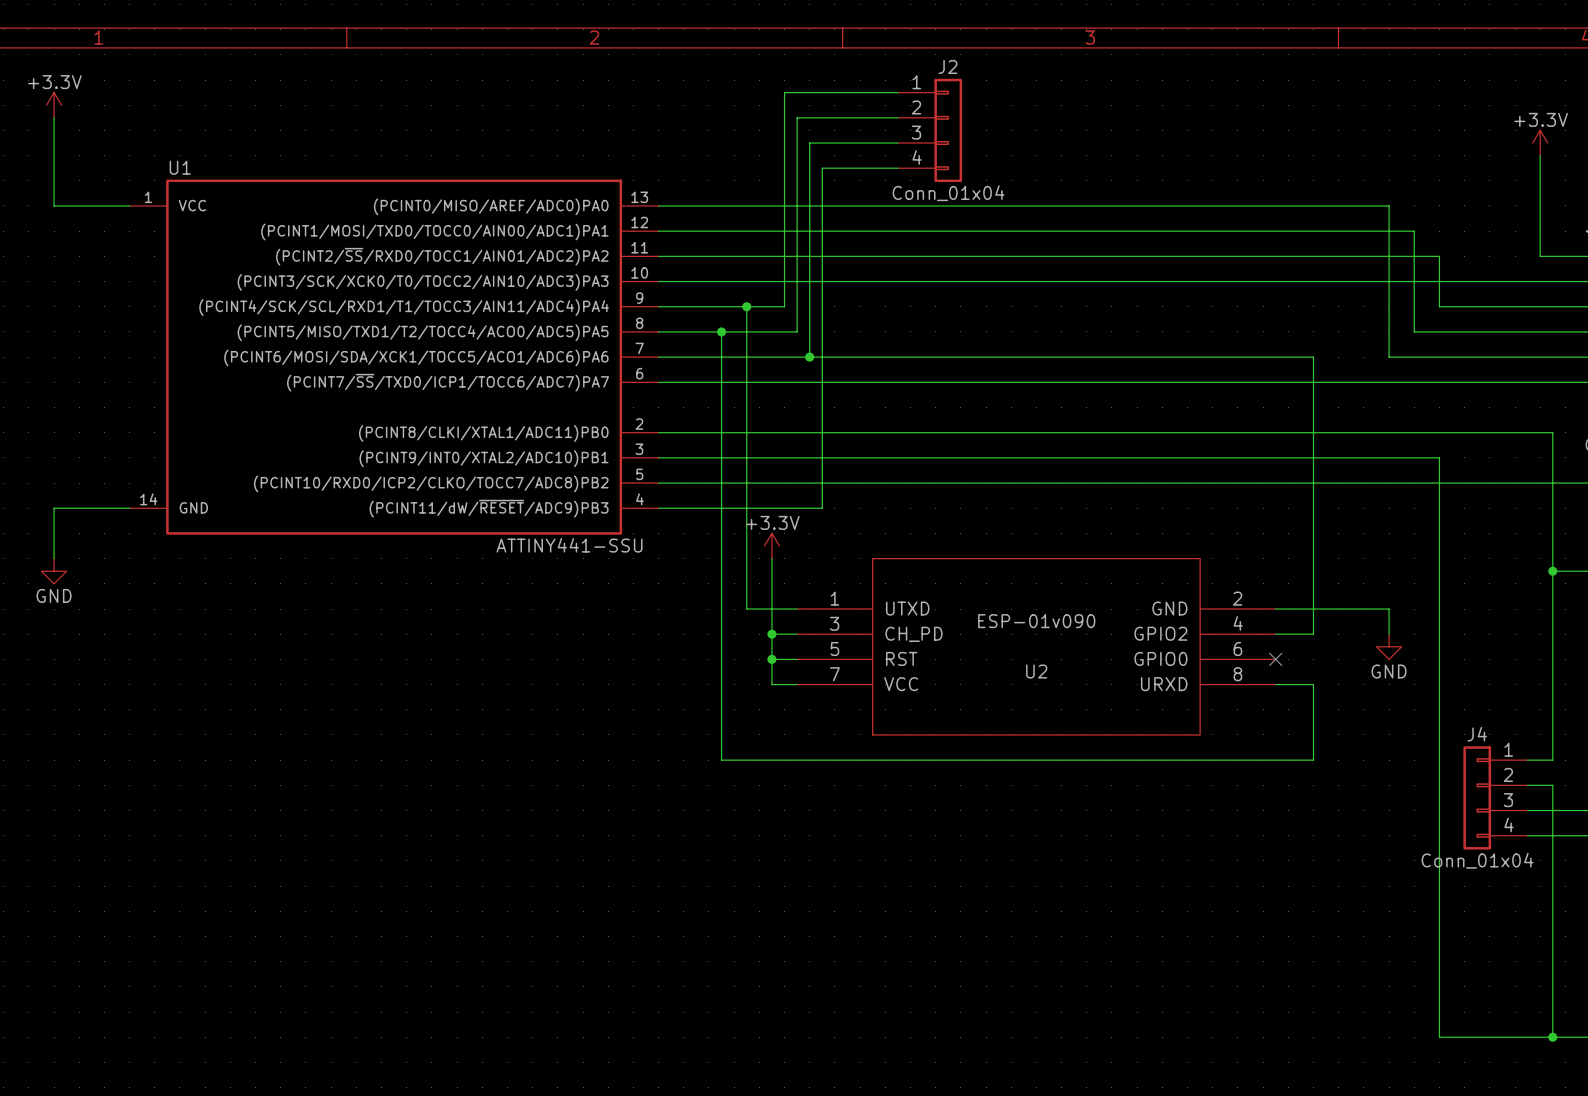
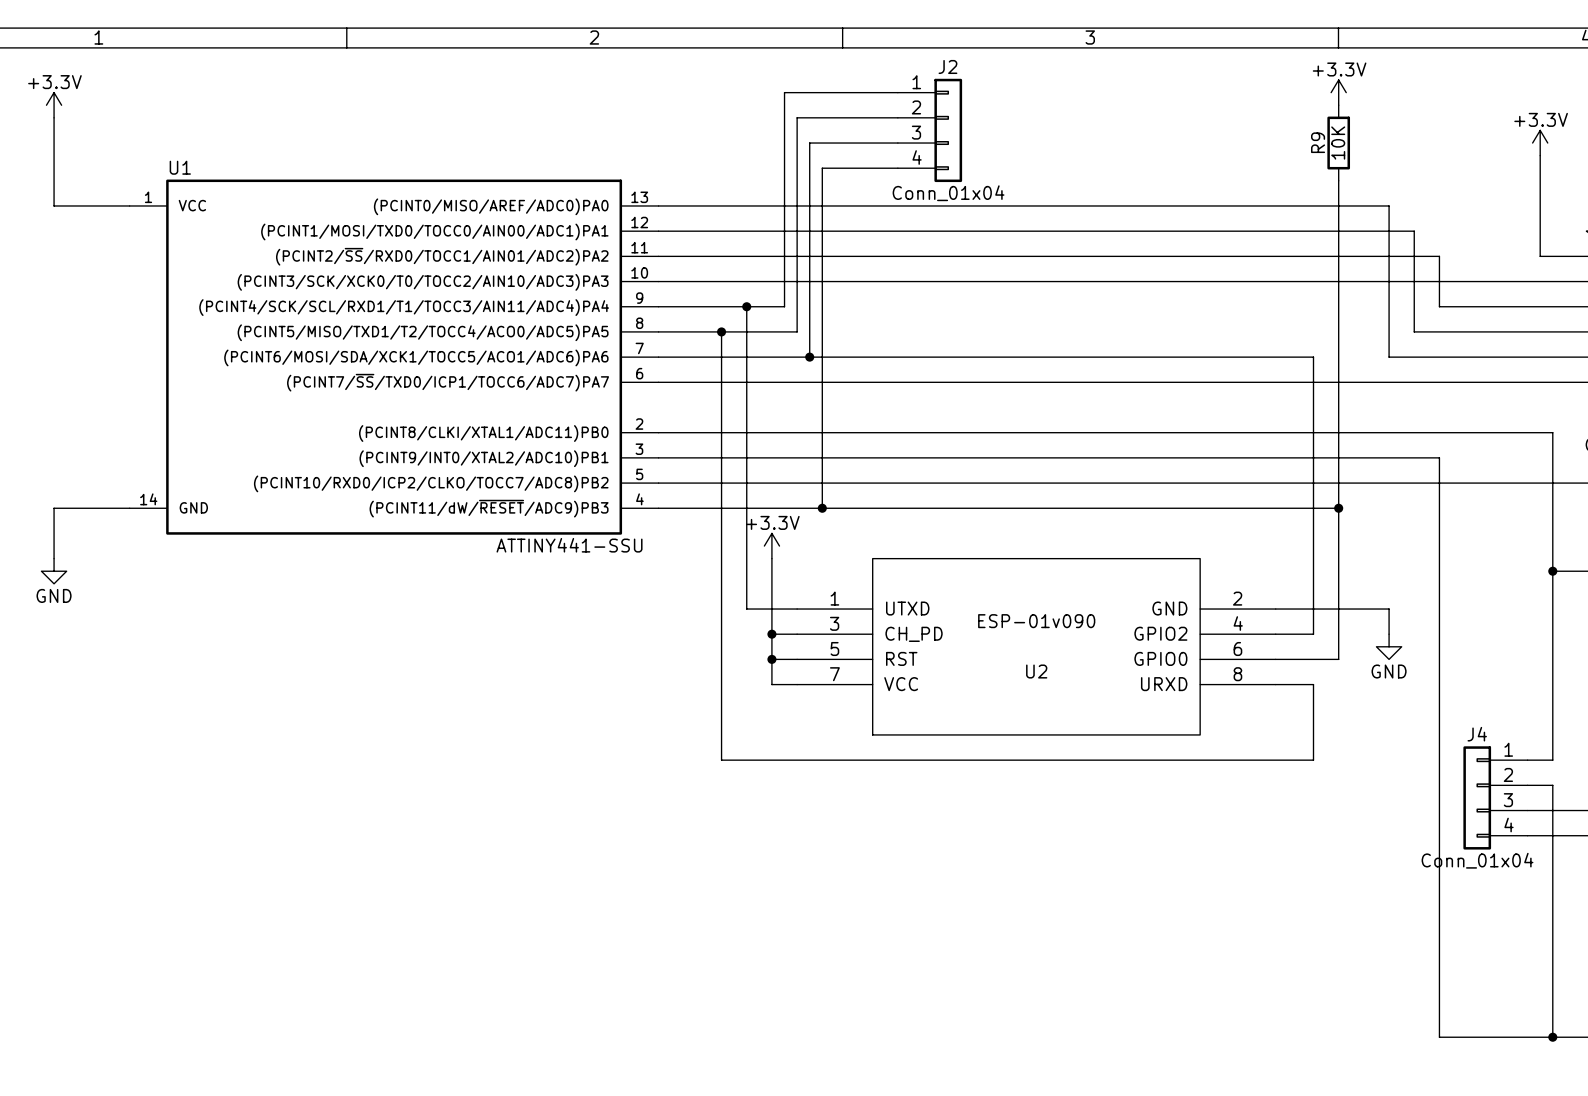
power symbol: none -> +3.3V (1338, 92)
R9: none -> 10K (1338, 143)
wire: none -> (1338, 180) (1338, 659) (1275, 659)
wire: none -> (822, 508) (1338, 508)
junction: none -> (822, 508)
junction: none -> (1338, 508)
no-connect mark: (1275, 659) -> none

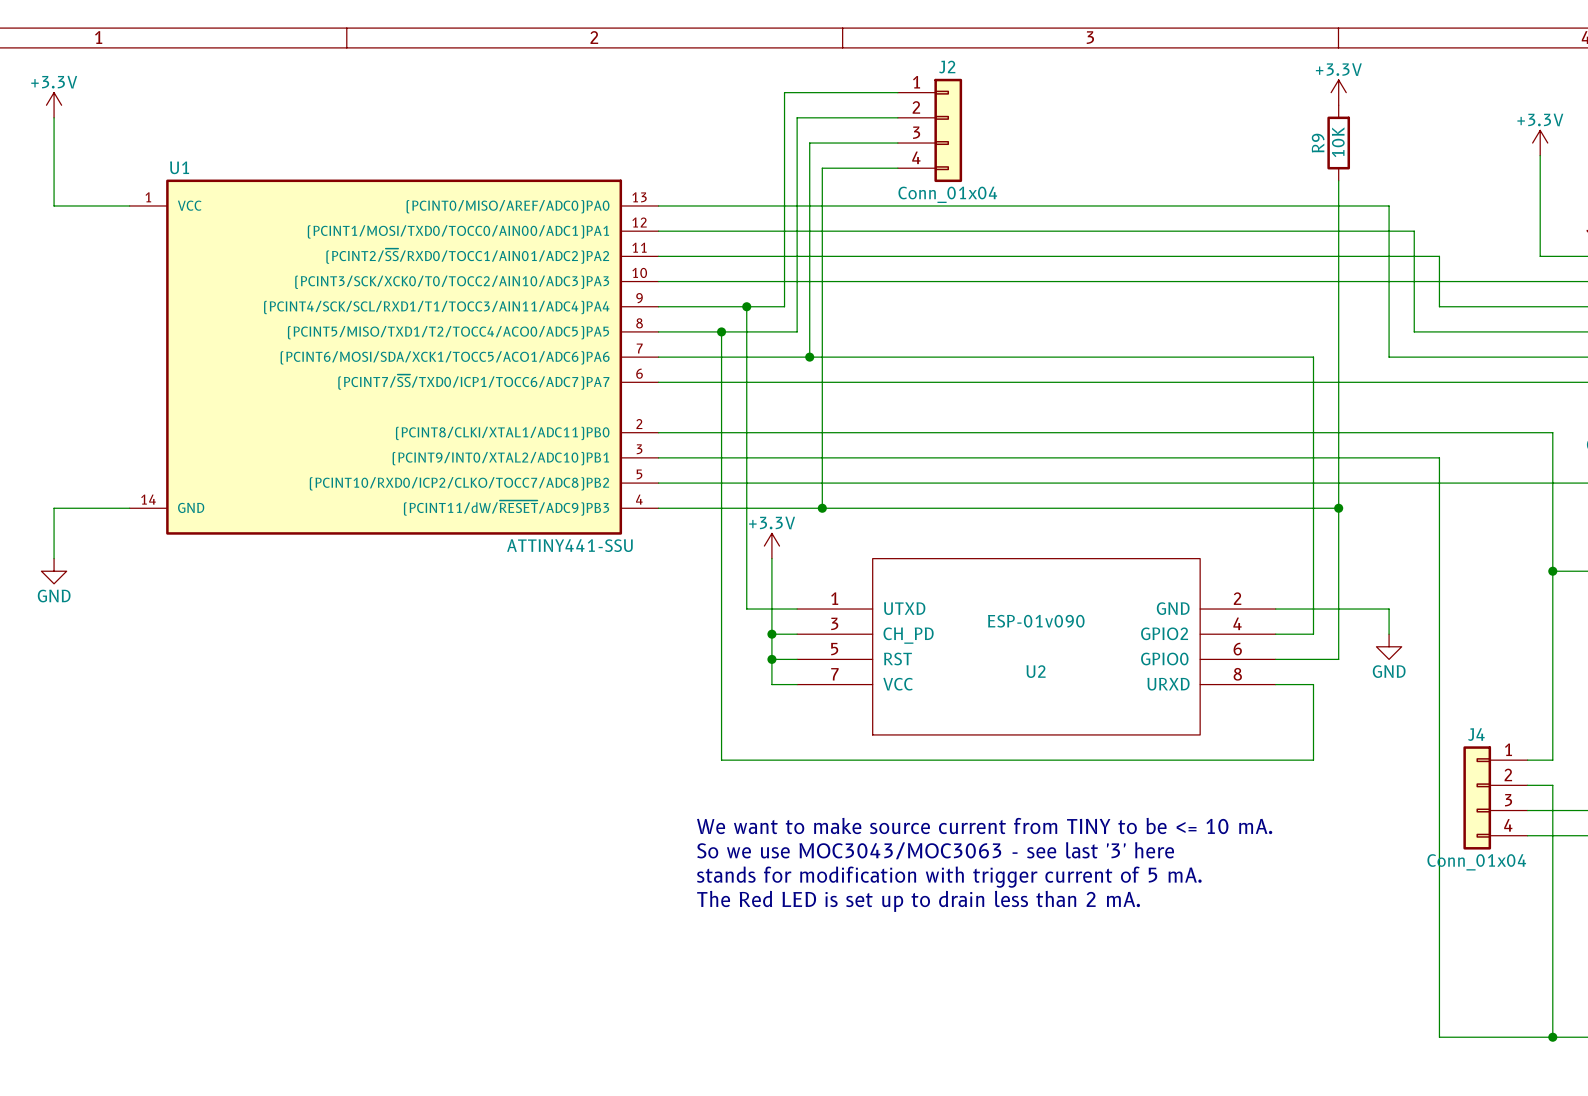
text: none -> We want to make source current from TINY to be <= 10 mA. (984, 825)
text: none -> So we use MOC3043/MOC3063 - see last '3' here (935, 850)
text: none -> stands for modification with trigger current of 5 mA. (949, 877)
text: none -> The Red LED is set up to drain less than 2 mA. (918, 901)

